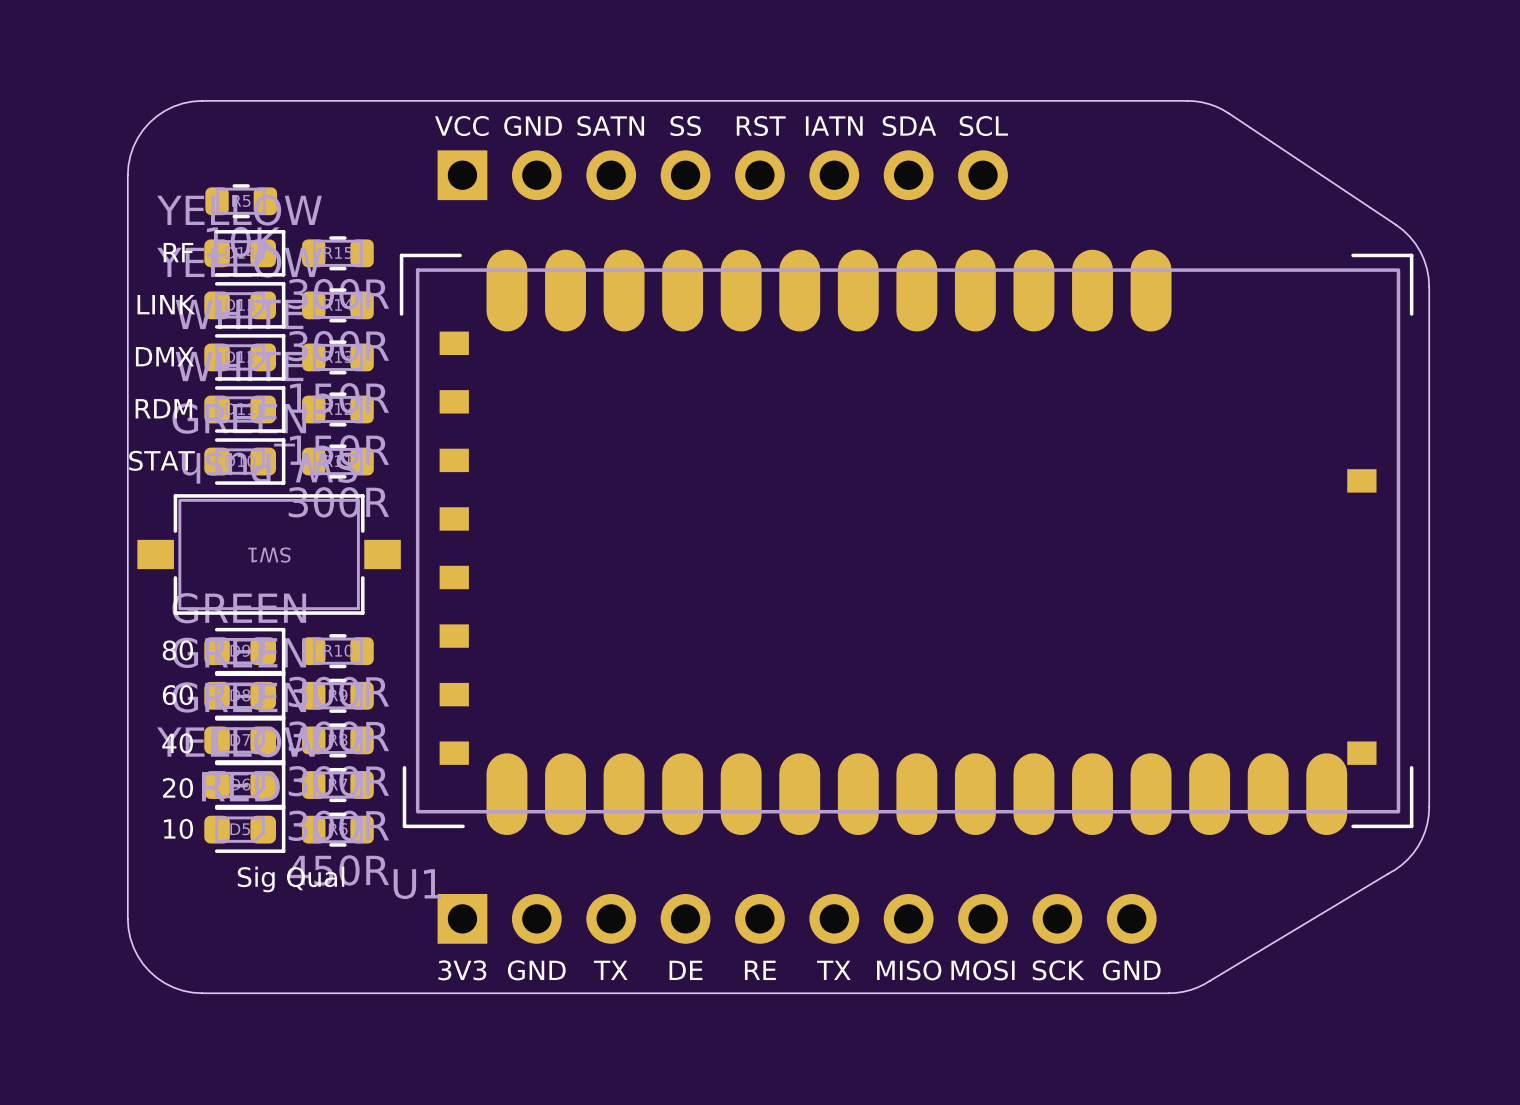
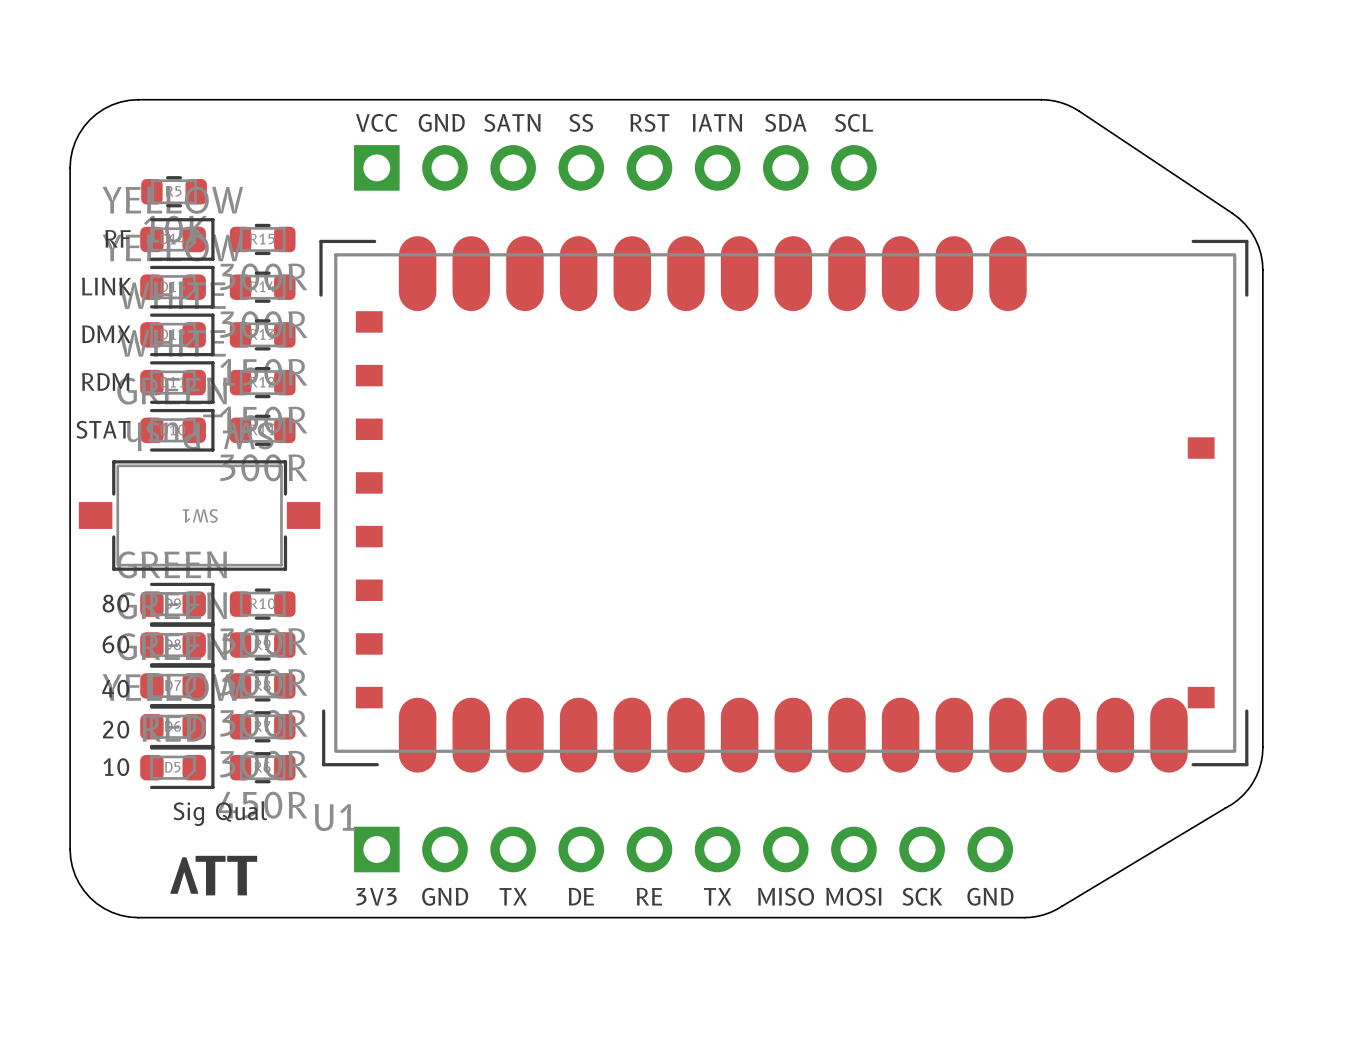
drawing: none -> [170, 857, 199, 894]
text: none -> TT (226, 875)

